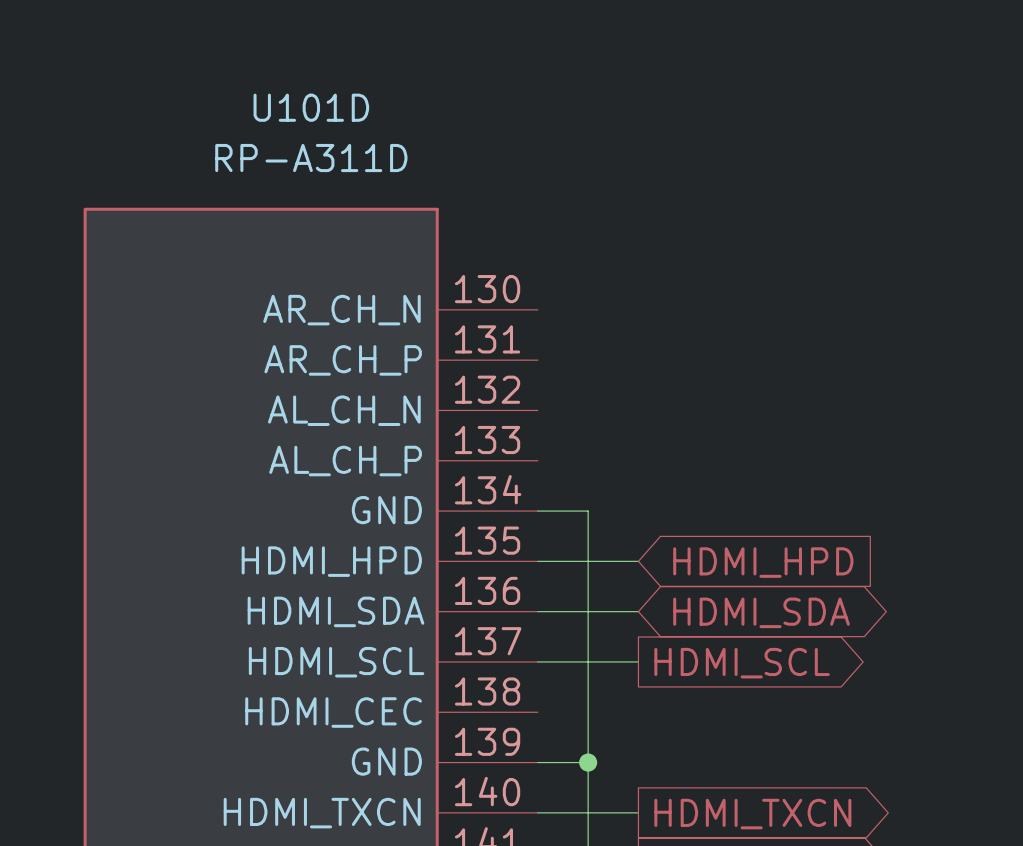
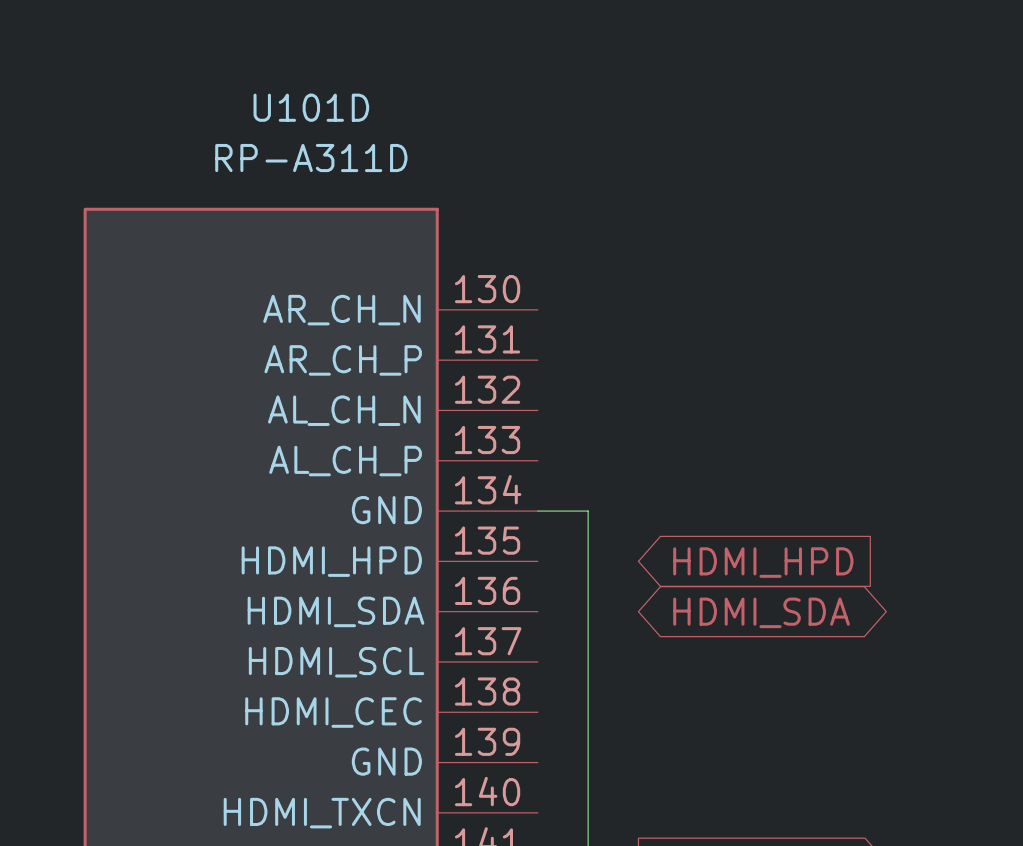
wire: (537, 561) (638, 561) -> none
wire: (537, 611) (638, 611) -> none
wire: (537, 661) (638, 661) -> none
global label: HDMI_SCL (742, 663) -> none
wire: (537, 762) (588, 762) -> none
junction: (588, 762) -> none
wire: (537, 812) (638, 812) -> none
global label: HDMI_TXCN (752, 814) -> none

